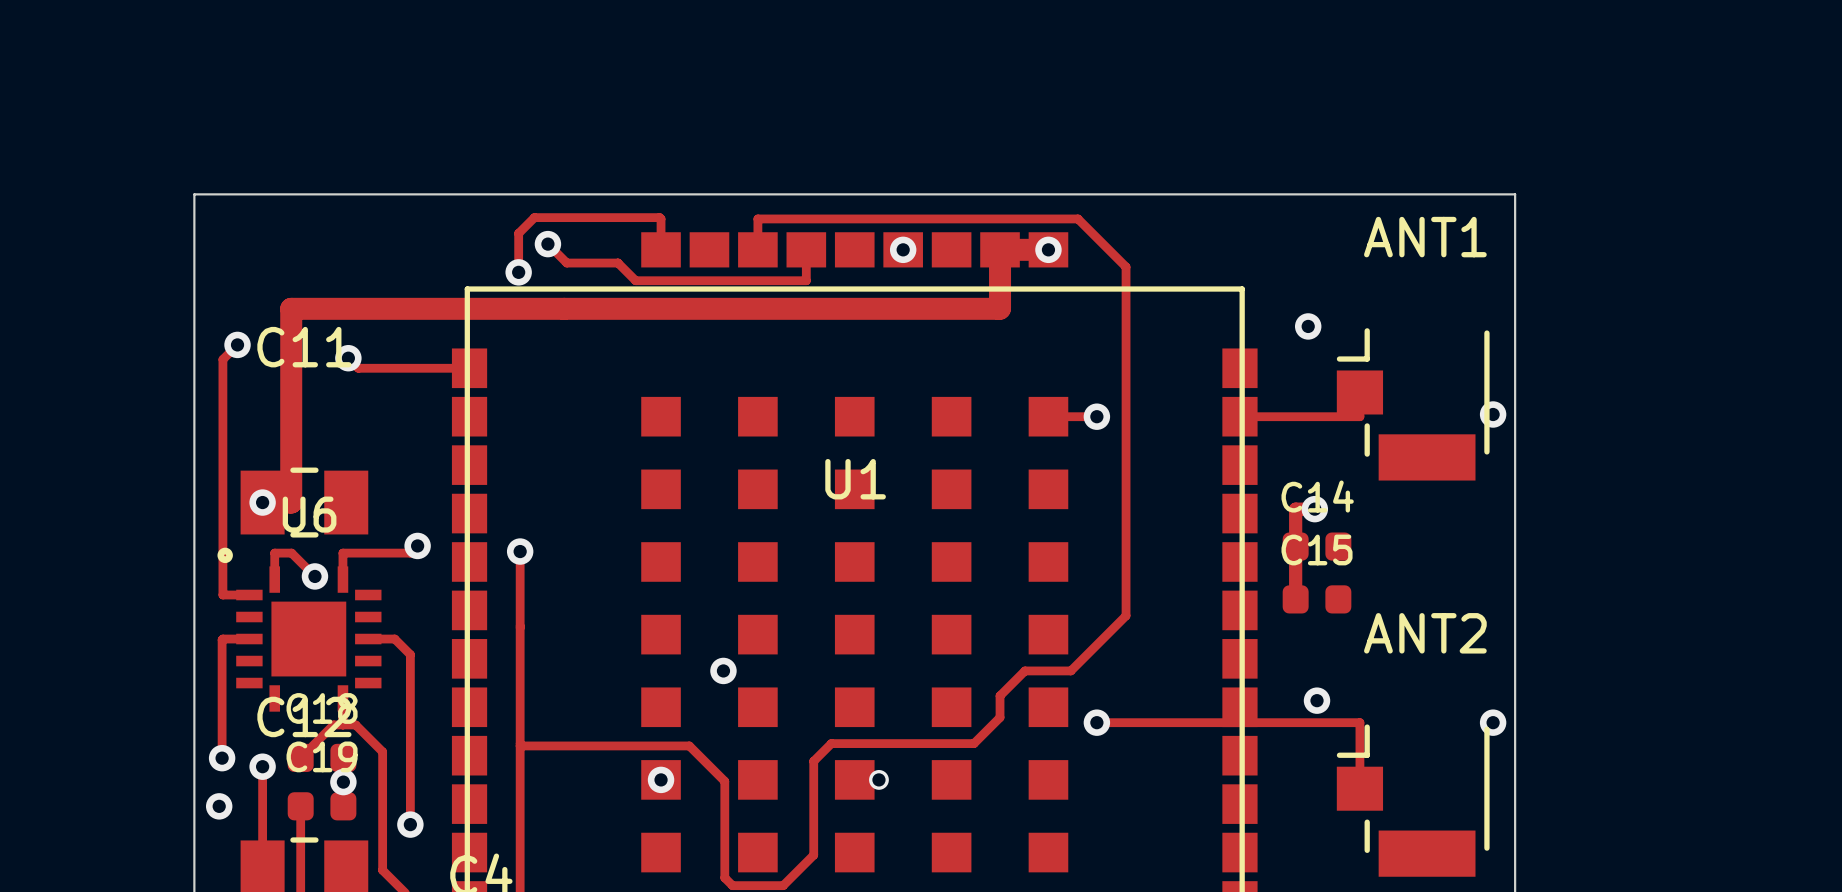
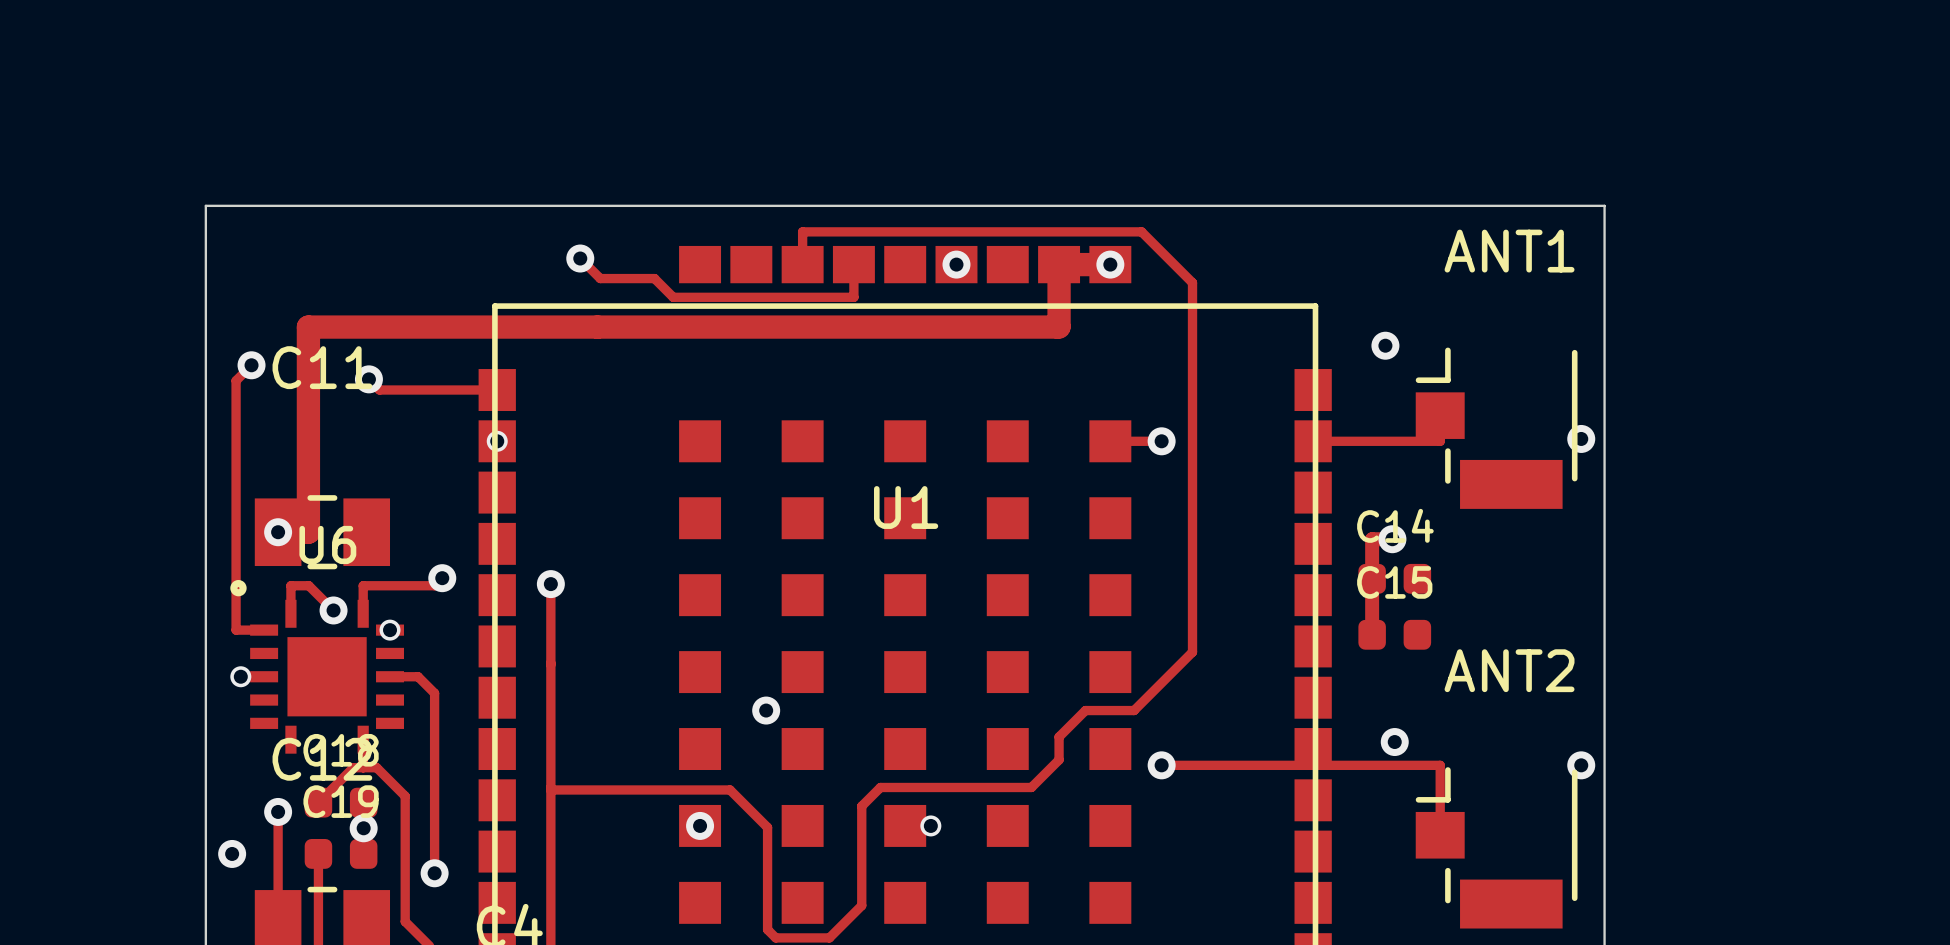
track: (661, 249) (659, 217) (534, 217) (518, 233) (518, 272) -> none
via: (518, 272) -> none
via: none -> (497, 441)
via: none -> (390, 630)
track: (227, 639) (222, 639) (222, 758) -> none
via: none -> (240, 676)
via: (222, 758) -> none

